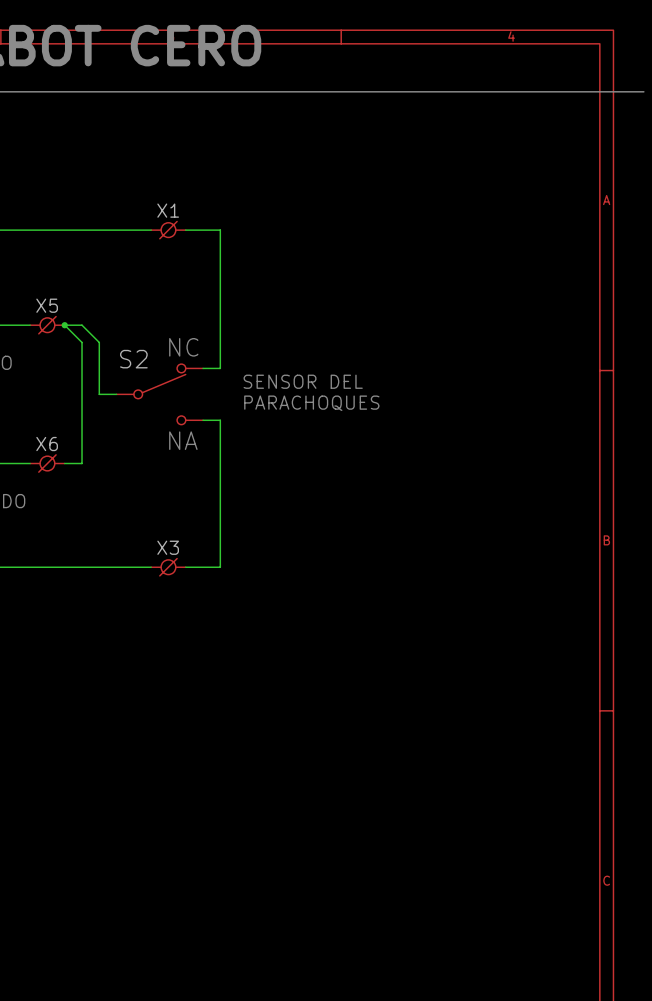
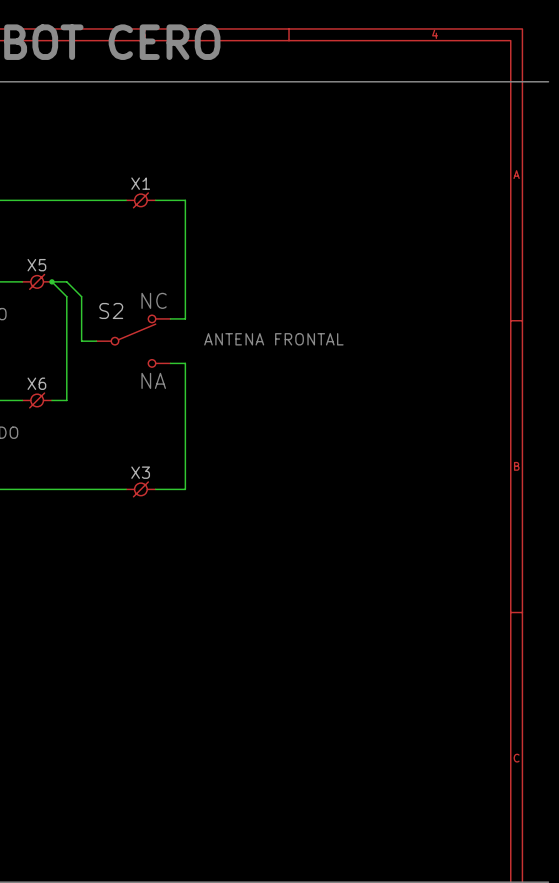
text: SENSOR DEL (303, 381) -> none
text: none -> ANTENA FRONTAL (273, 339)
text: PARACHOQUES (311, 403) -> none

